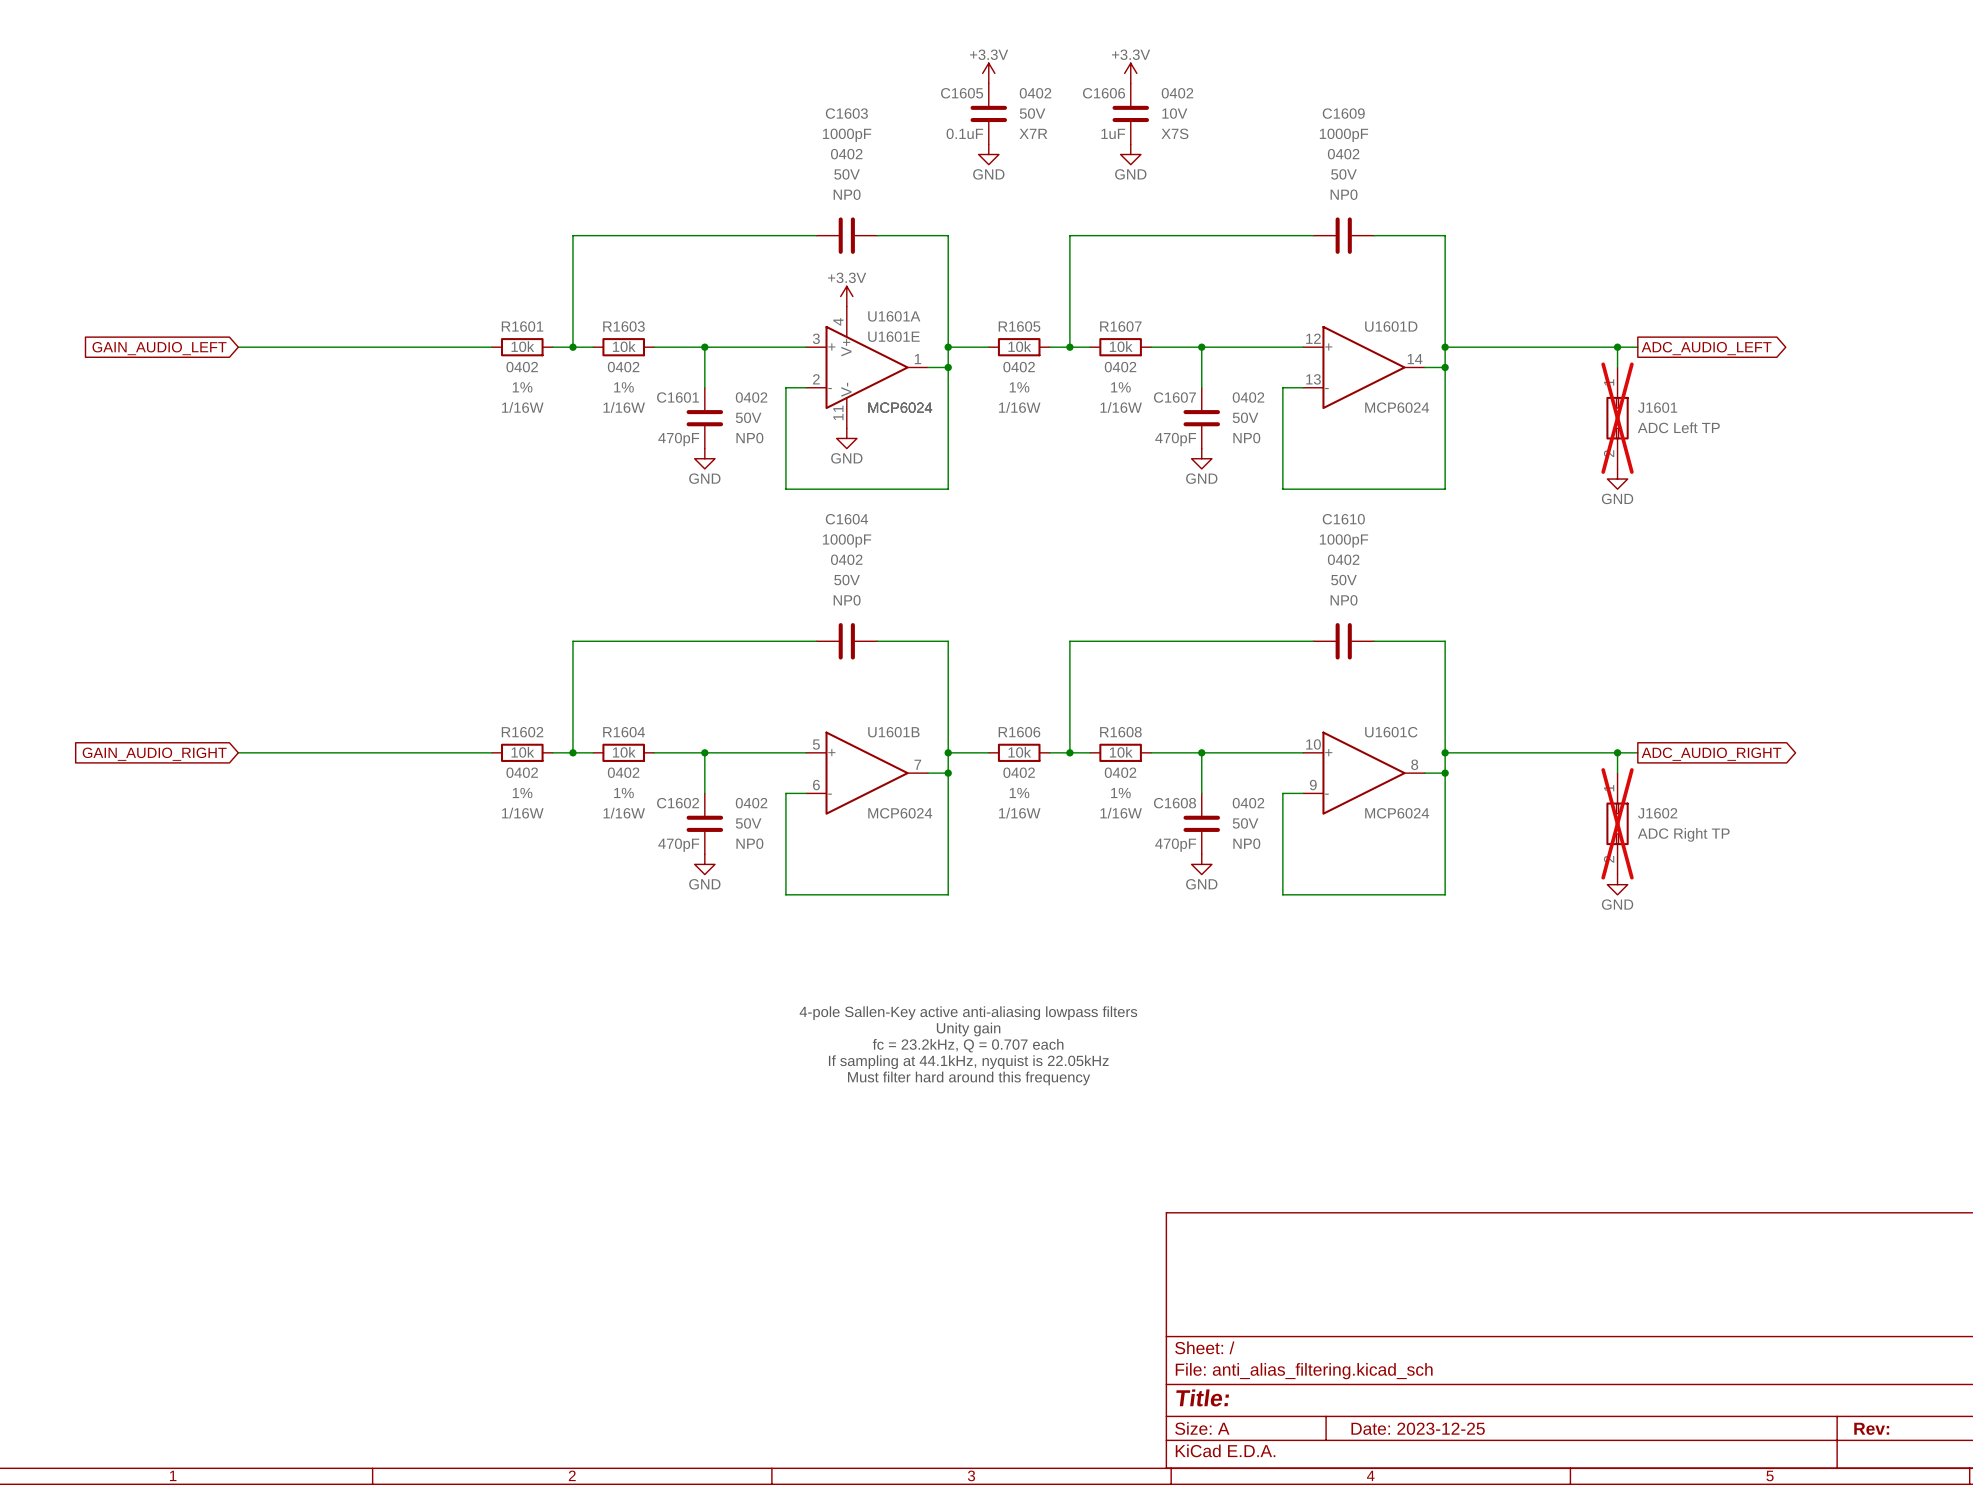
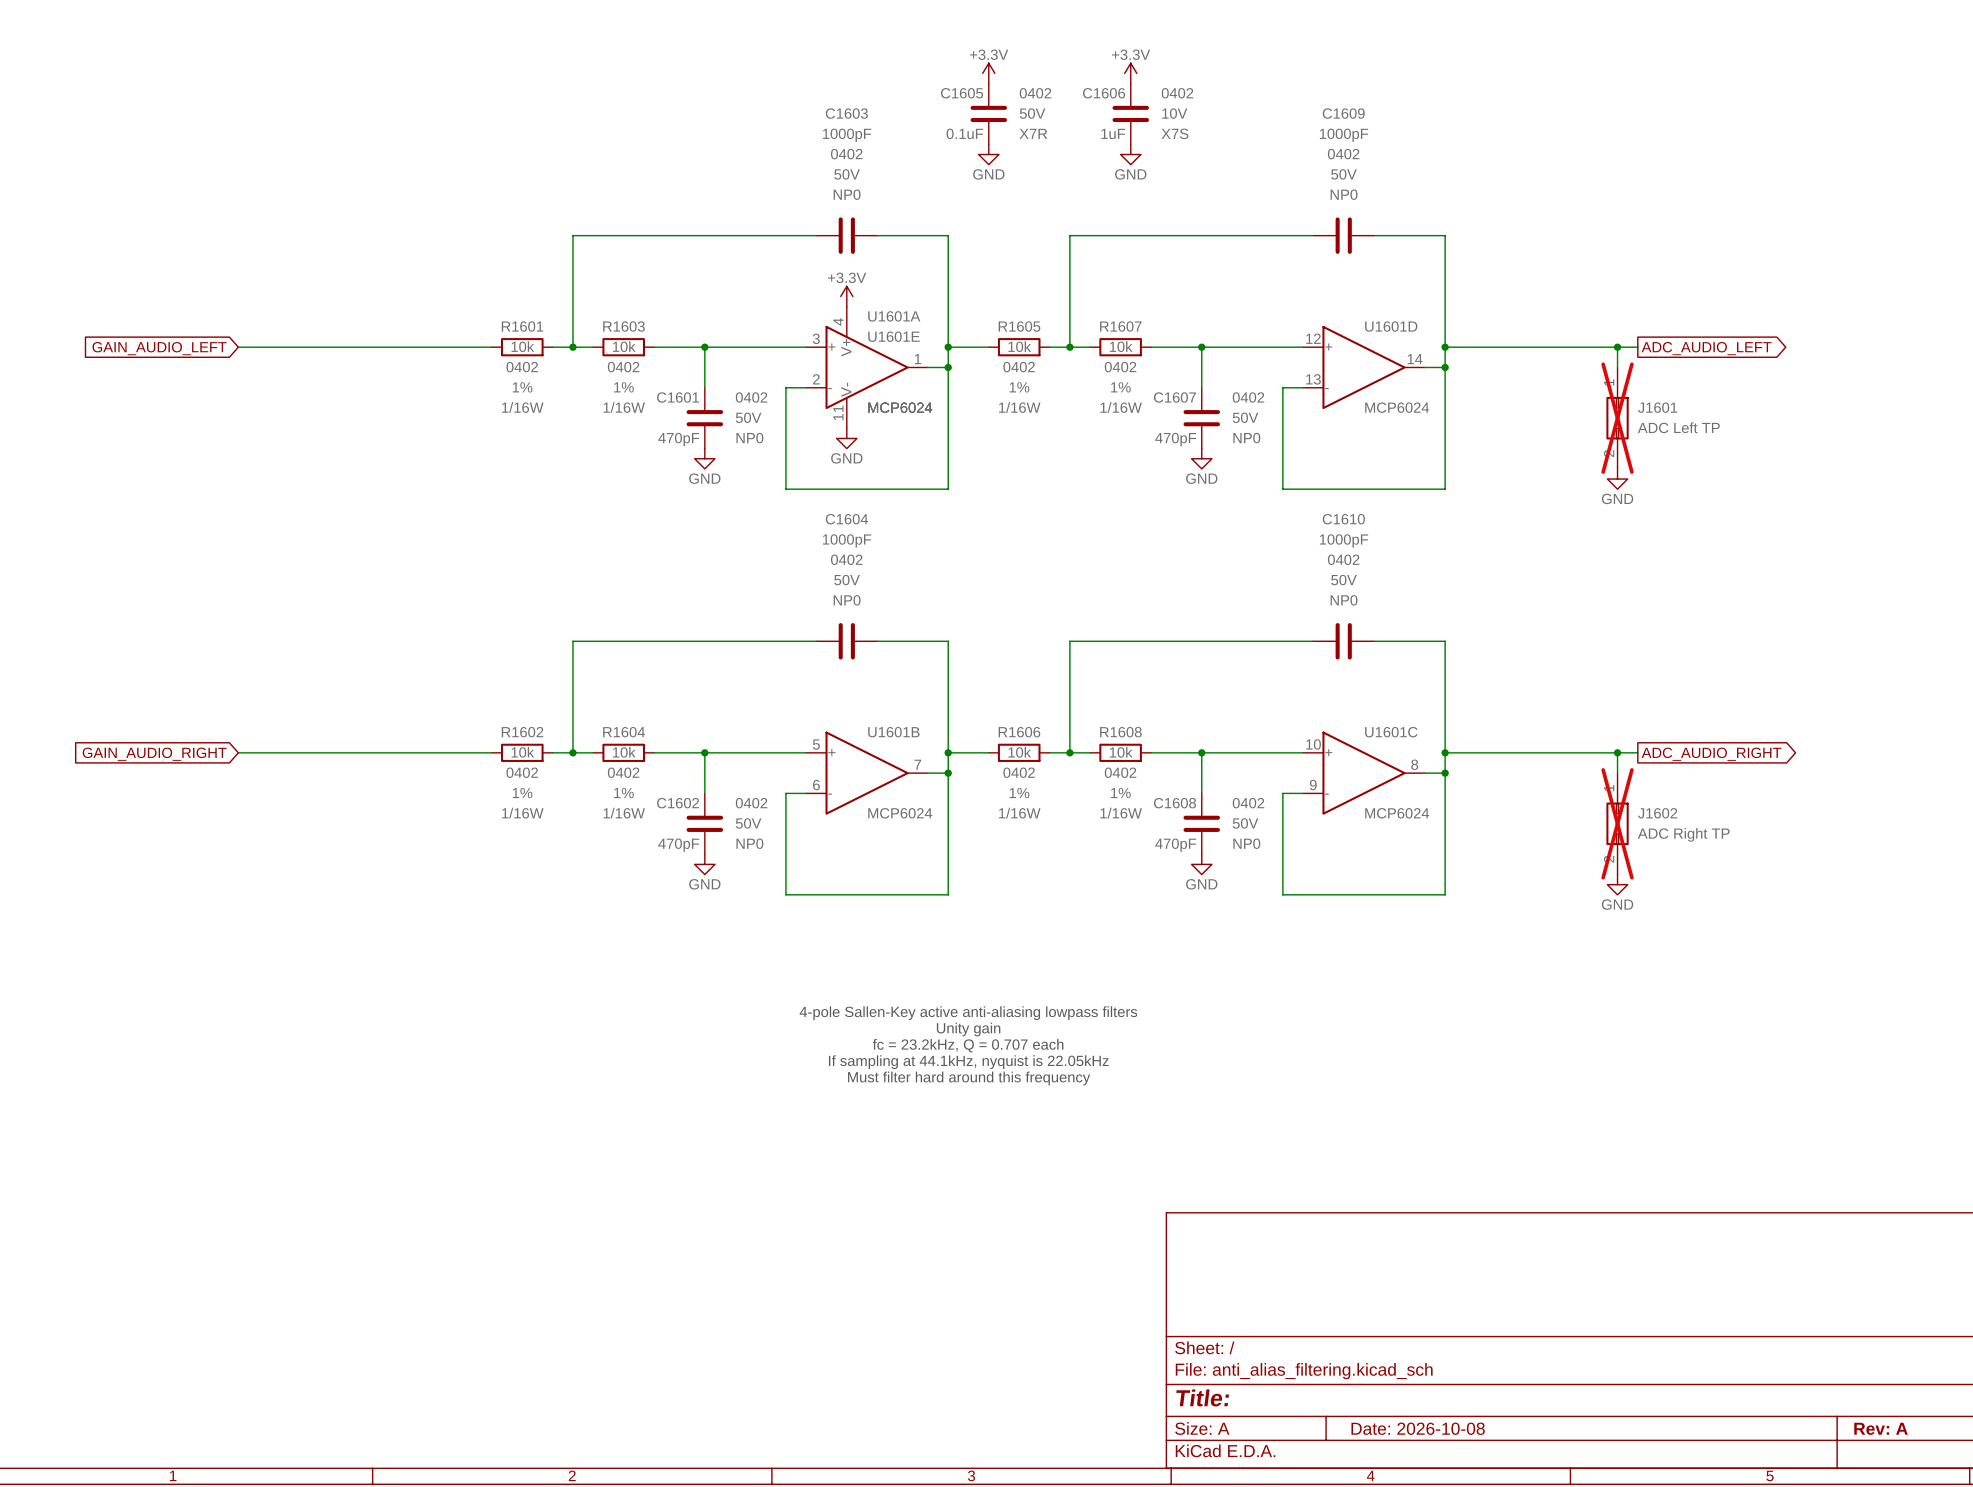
title block: Date: 2023-12-25 (1418, 1428) -> Date: 2026-10-08 (1418, 1428)
title block: Rev: (1871, 1428) -> Rev: A (1881, 1428)

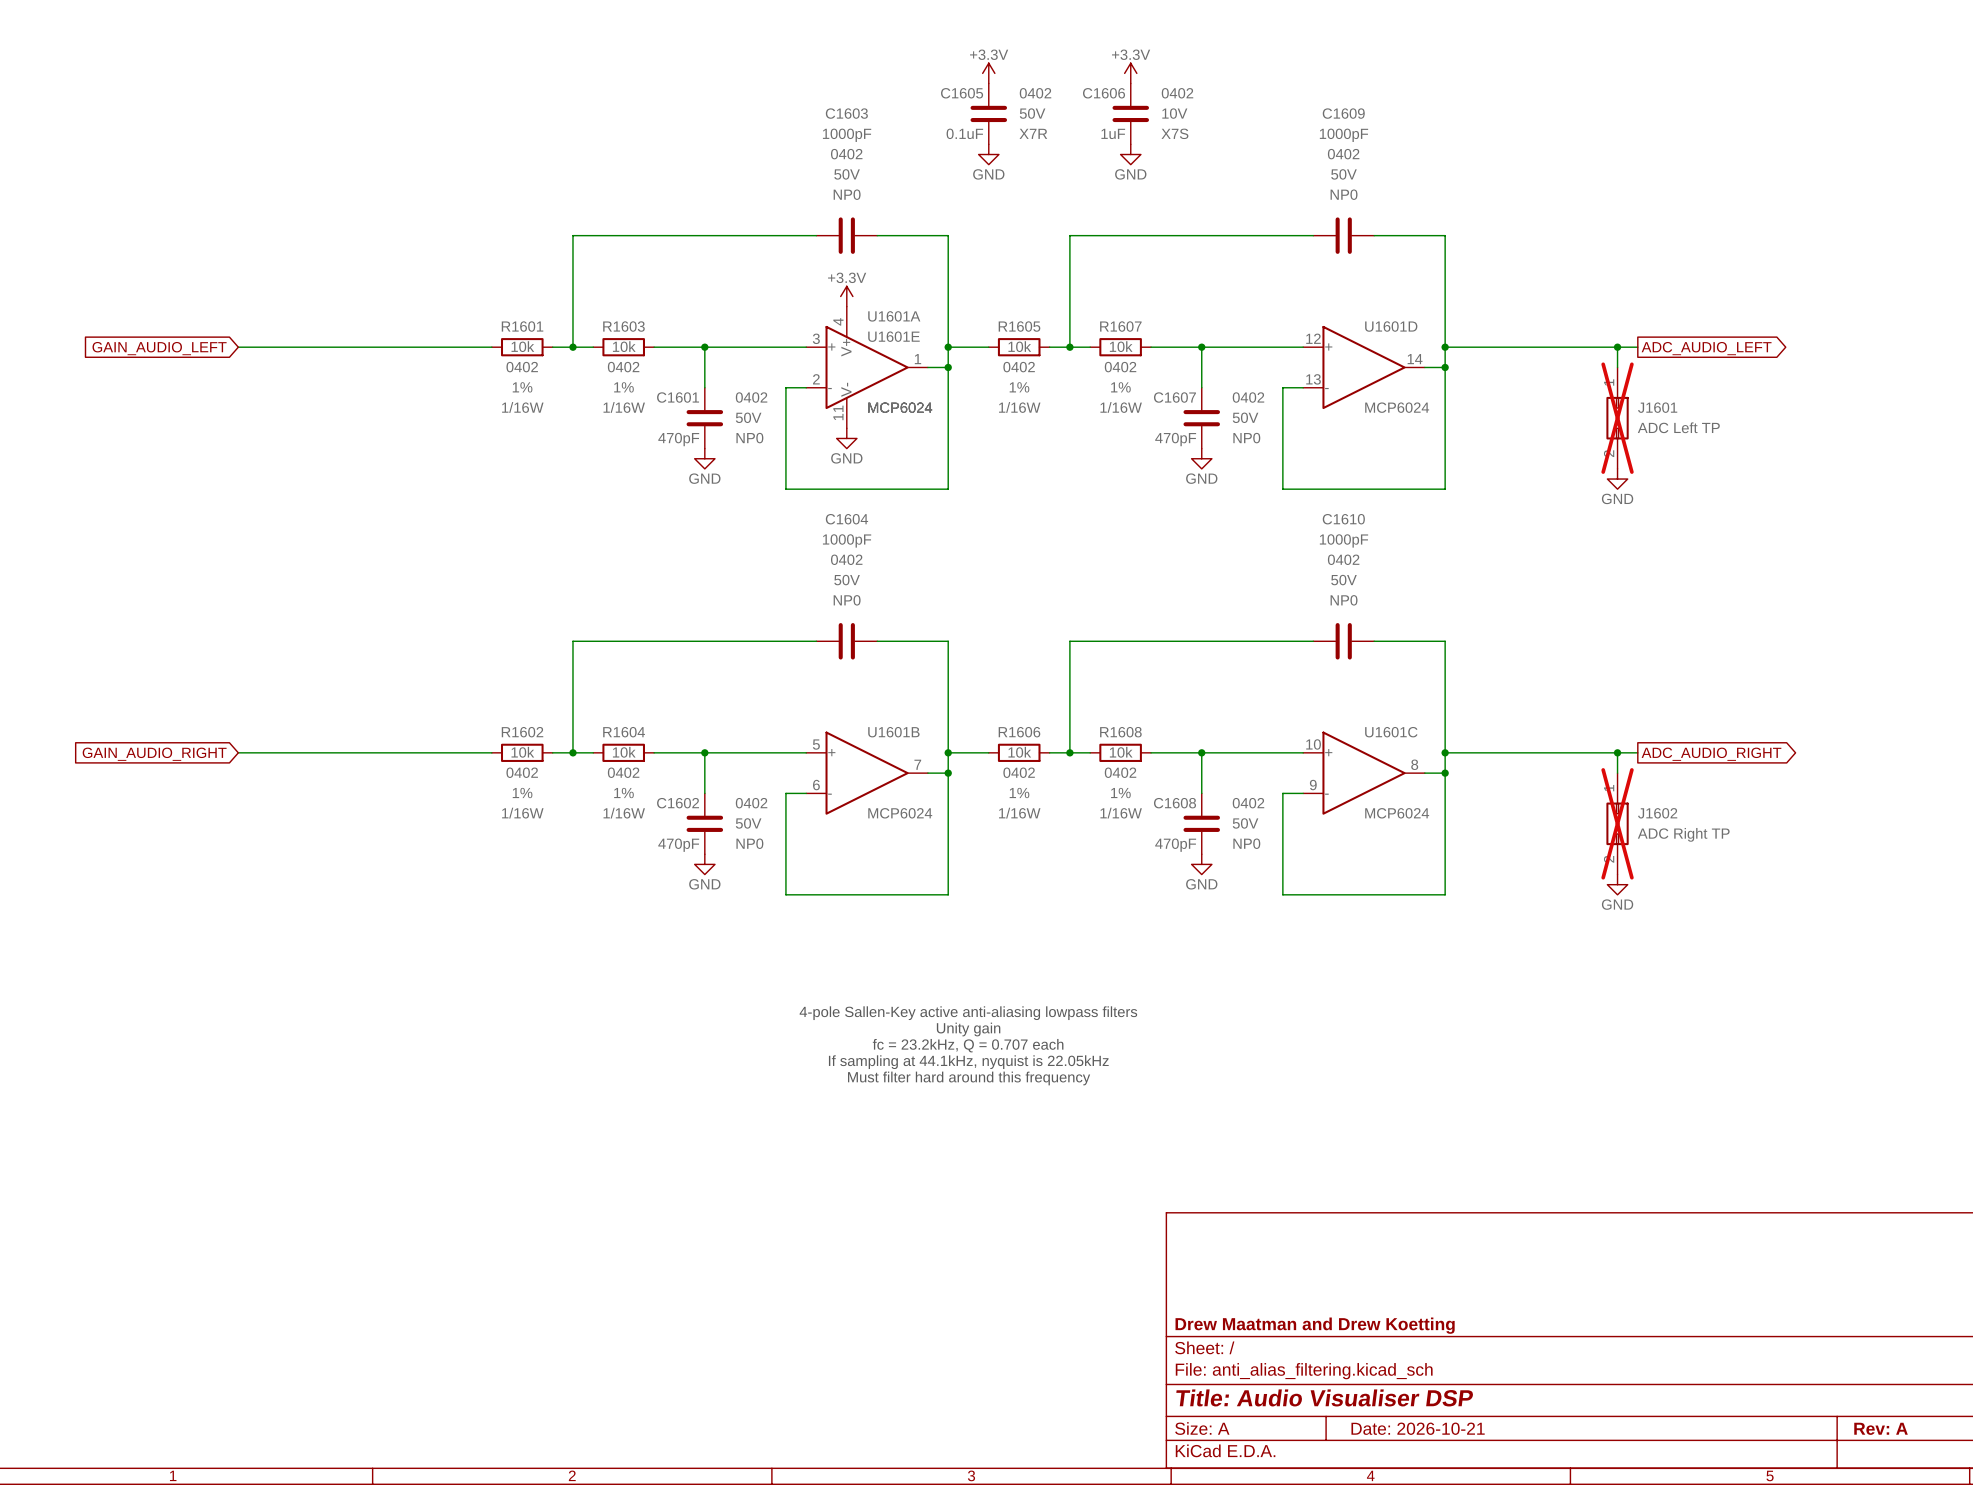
title block: none -> Drew Maatman and Drew Koetting (1315, 1325)
title block: Title: (1202, 1397) -> Title: Audio Visualiser DSP (1324, 1397)
title block: Date: 2026-10-08 (1418, 1428) -> Date: 2026-10-21 (1418, 1428)

